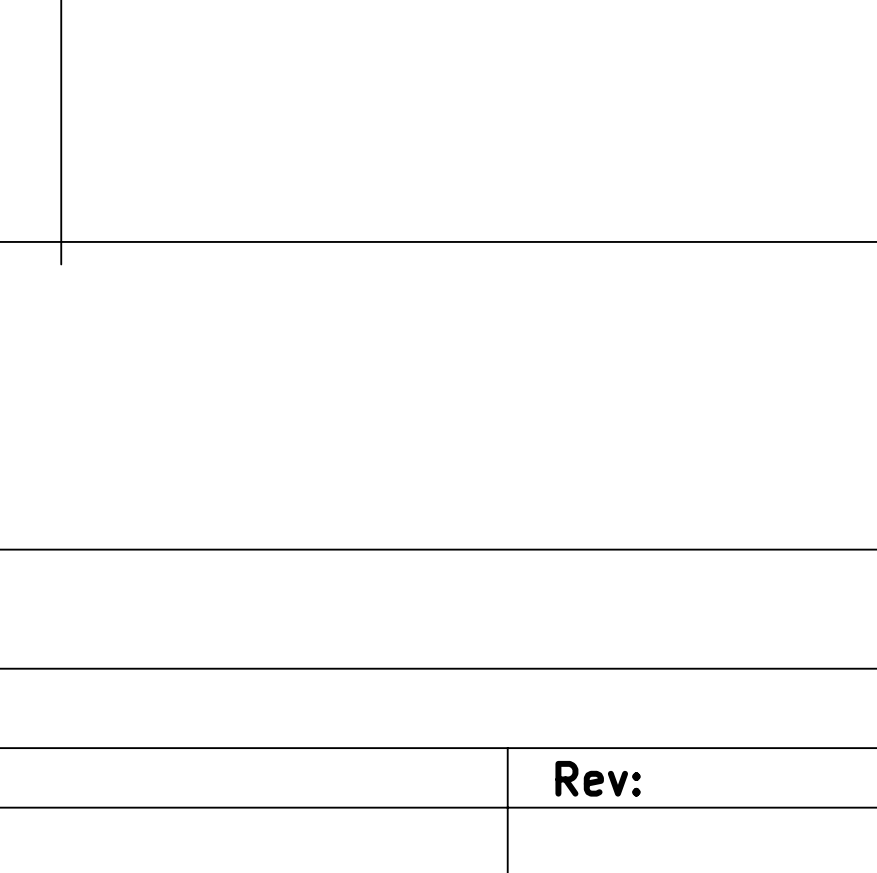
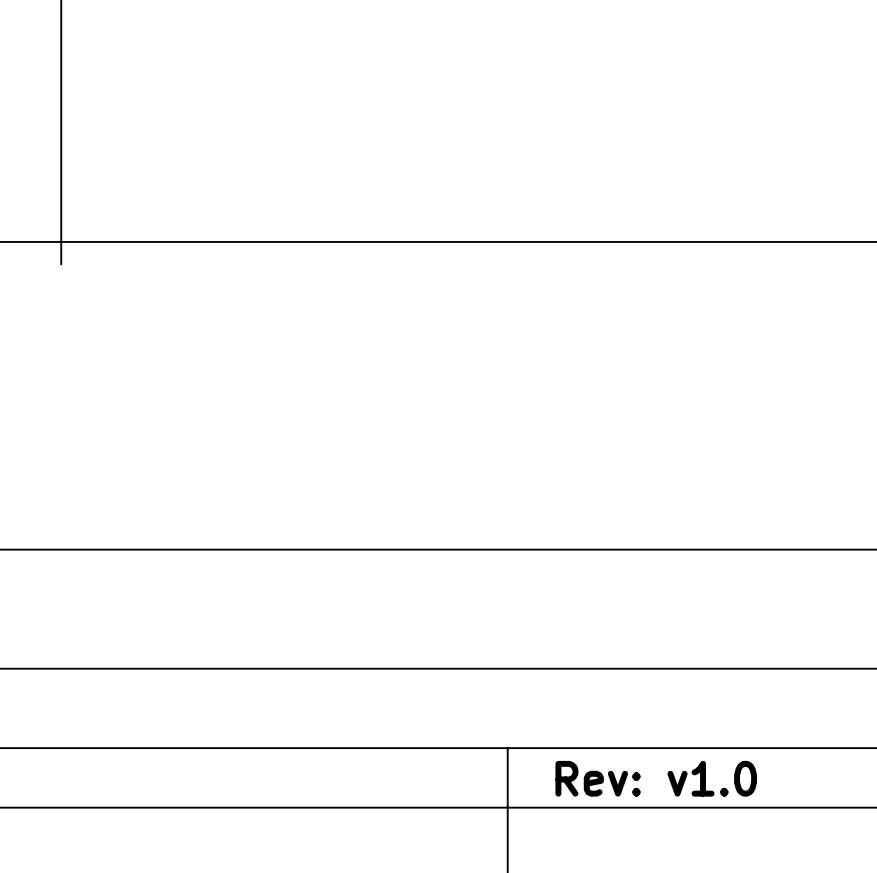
title block: Rev: (598, 778) -> Rev: v1.0 (656, 778)

